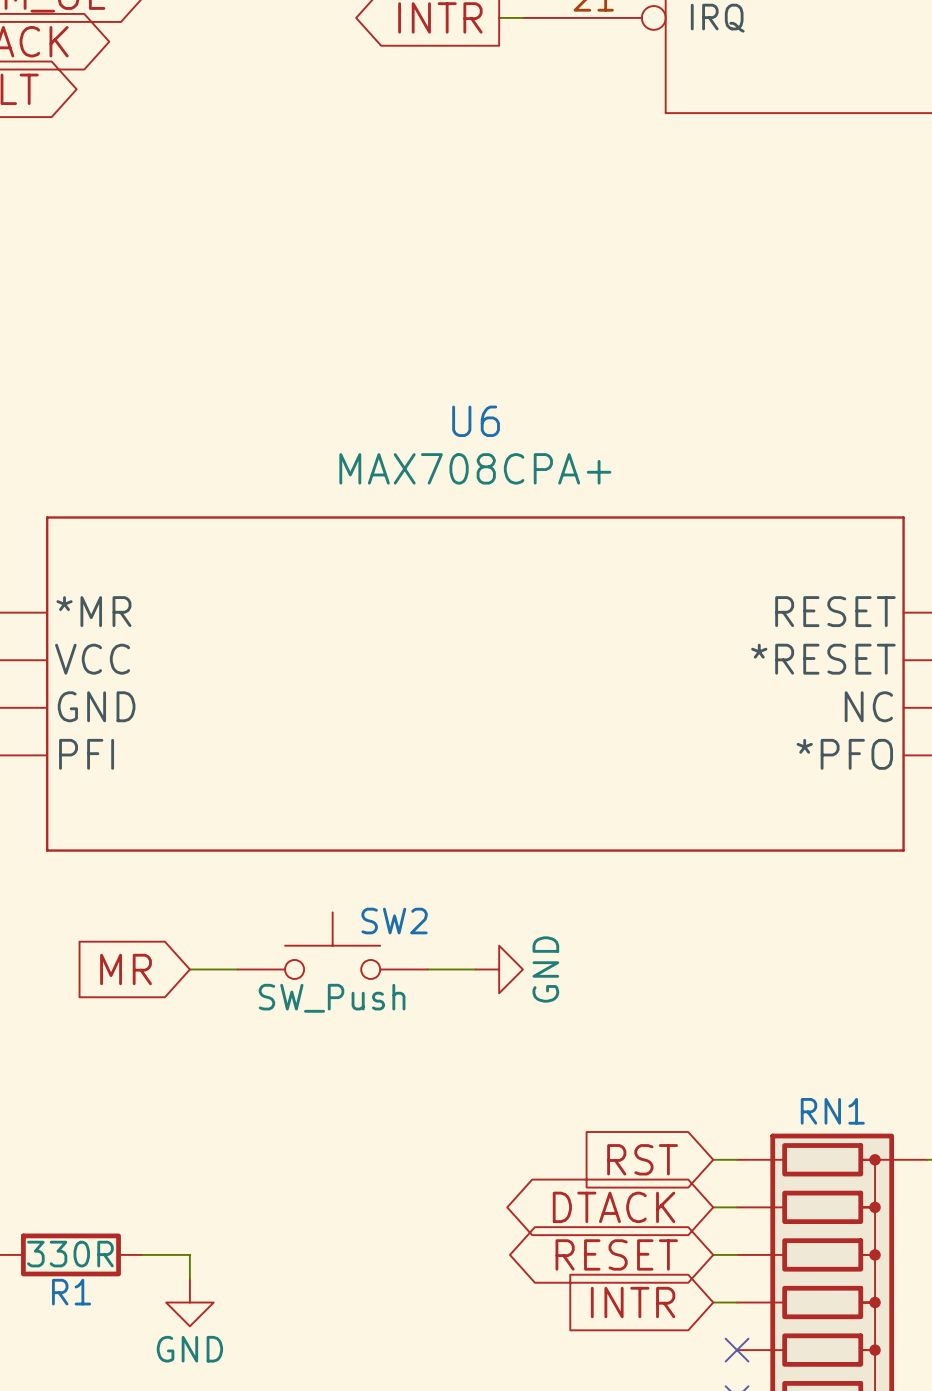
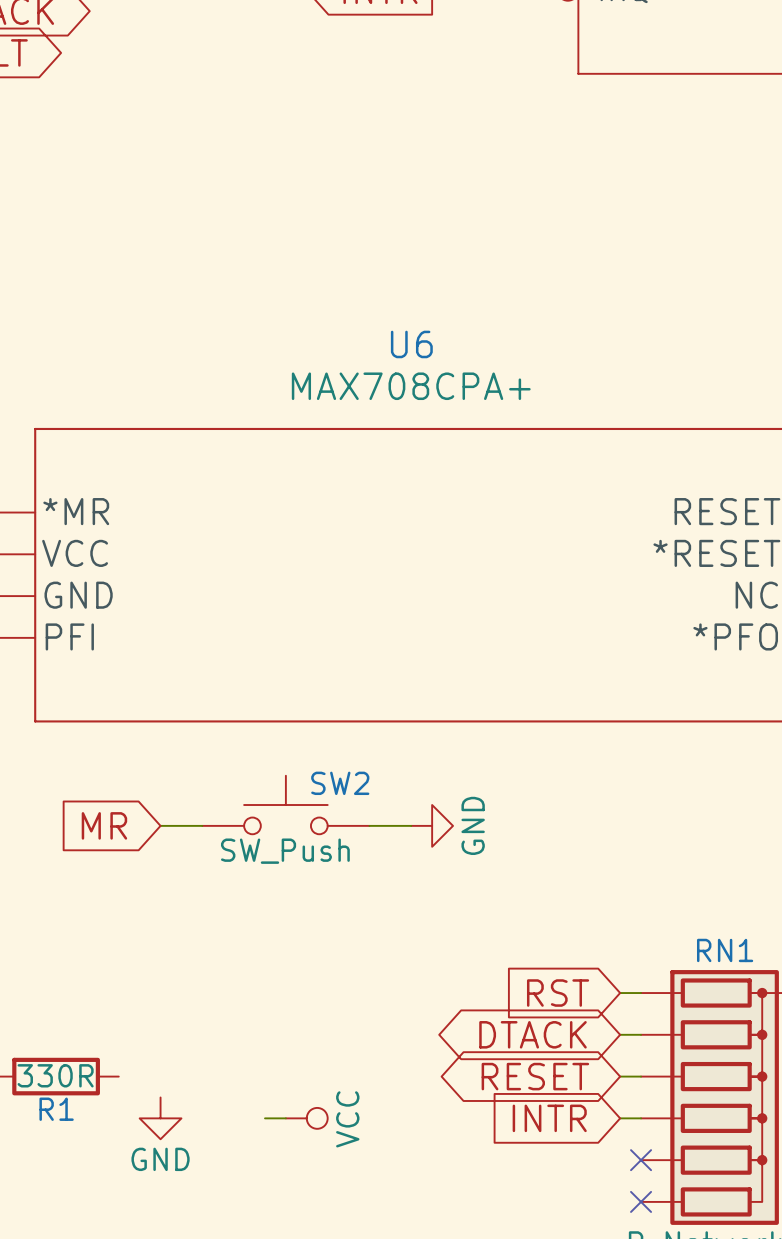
wire: (142, 1254) (189, 1254) (189, 1278) -> none
wire: none -> (265, 1118) (285, 1118)
power symbol: none -> VCC (306, 1118)

